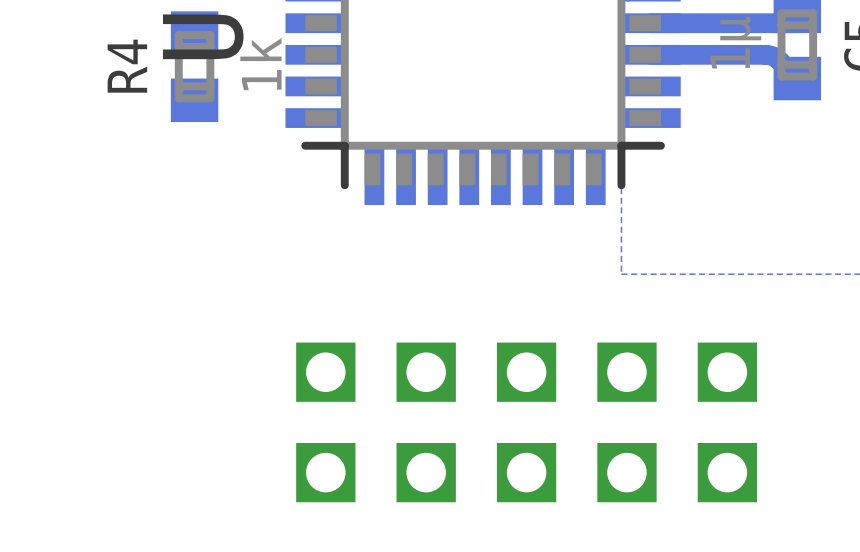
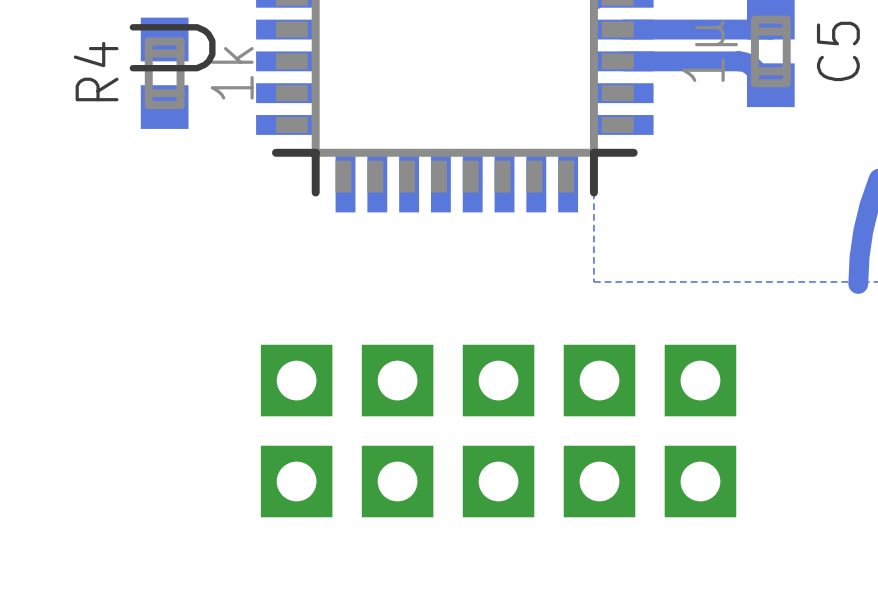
part footprint: [296, 342, 758, 503] -> [260, 344, 737, 518]

